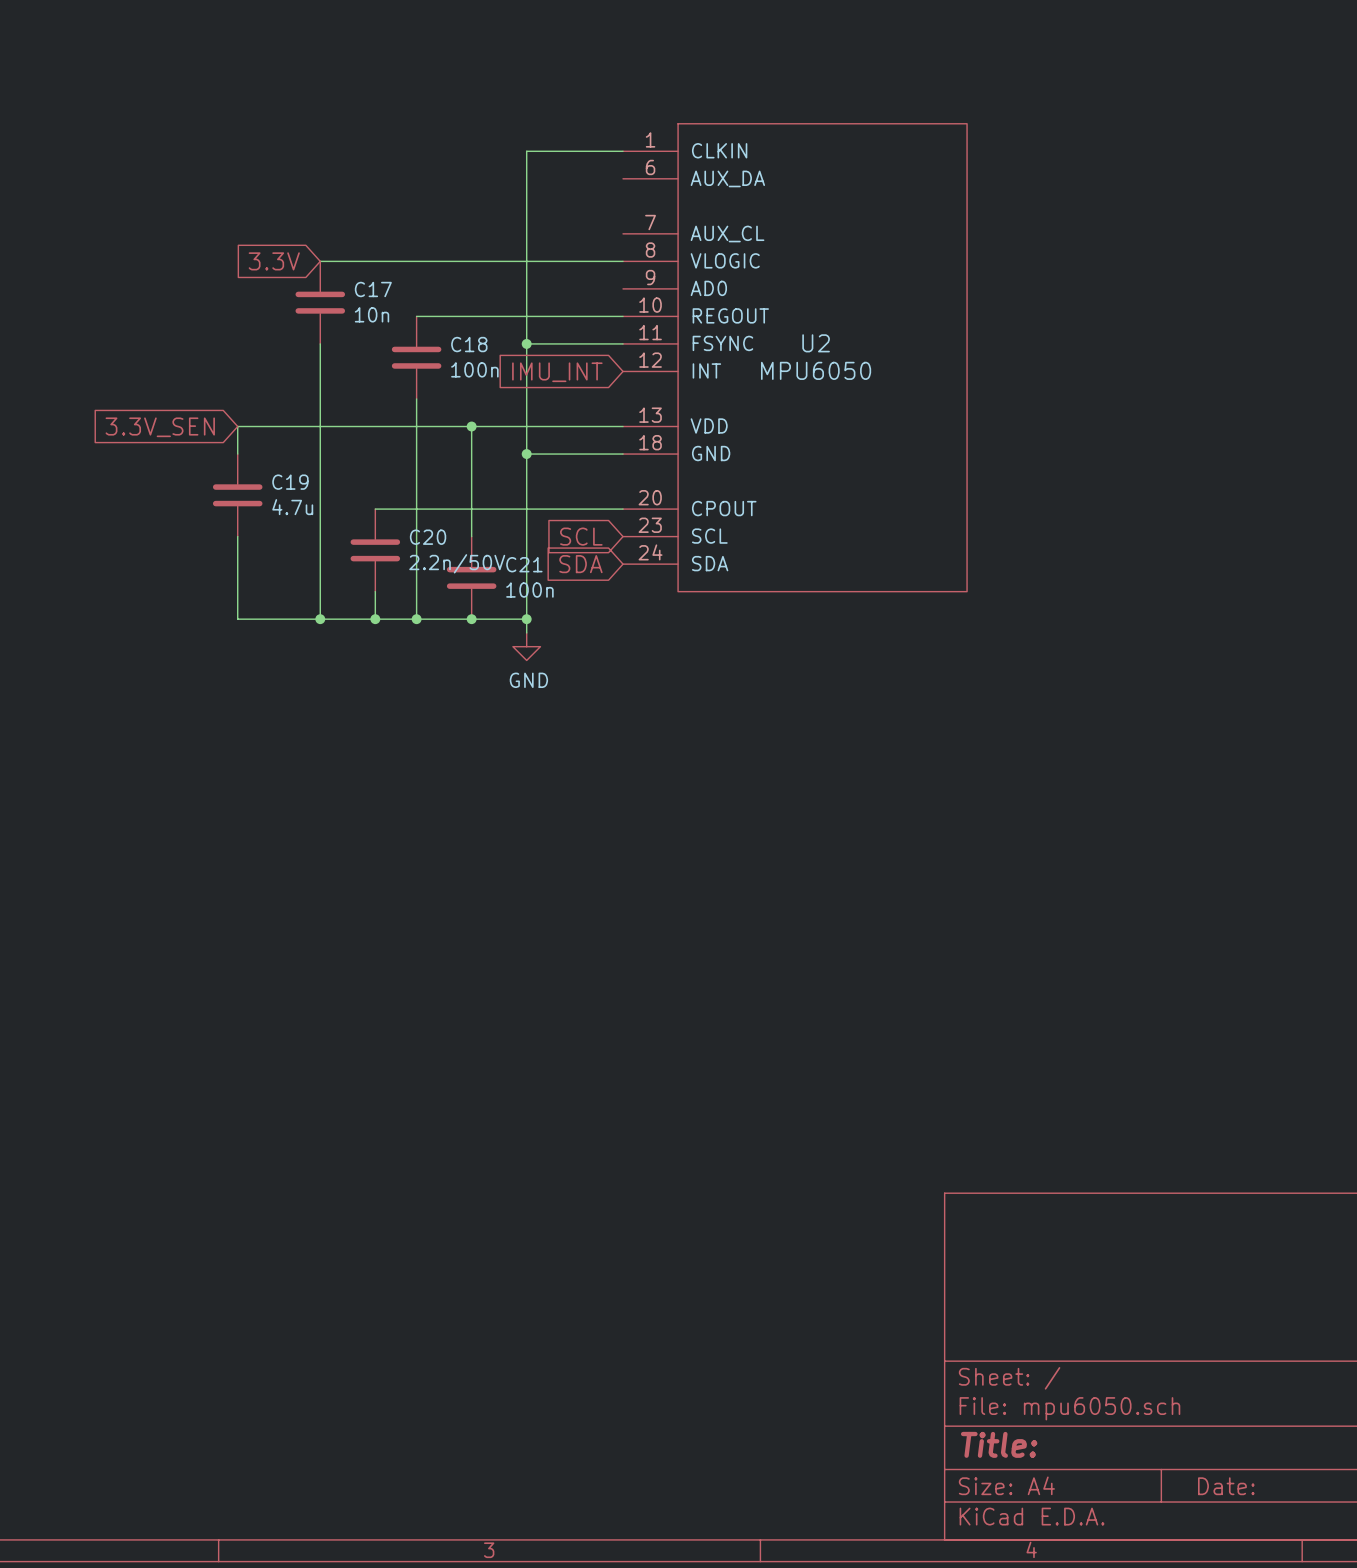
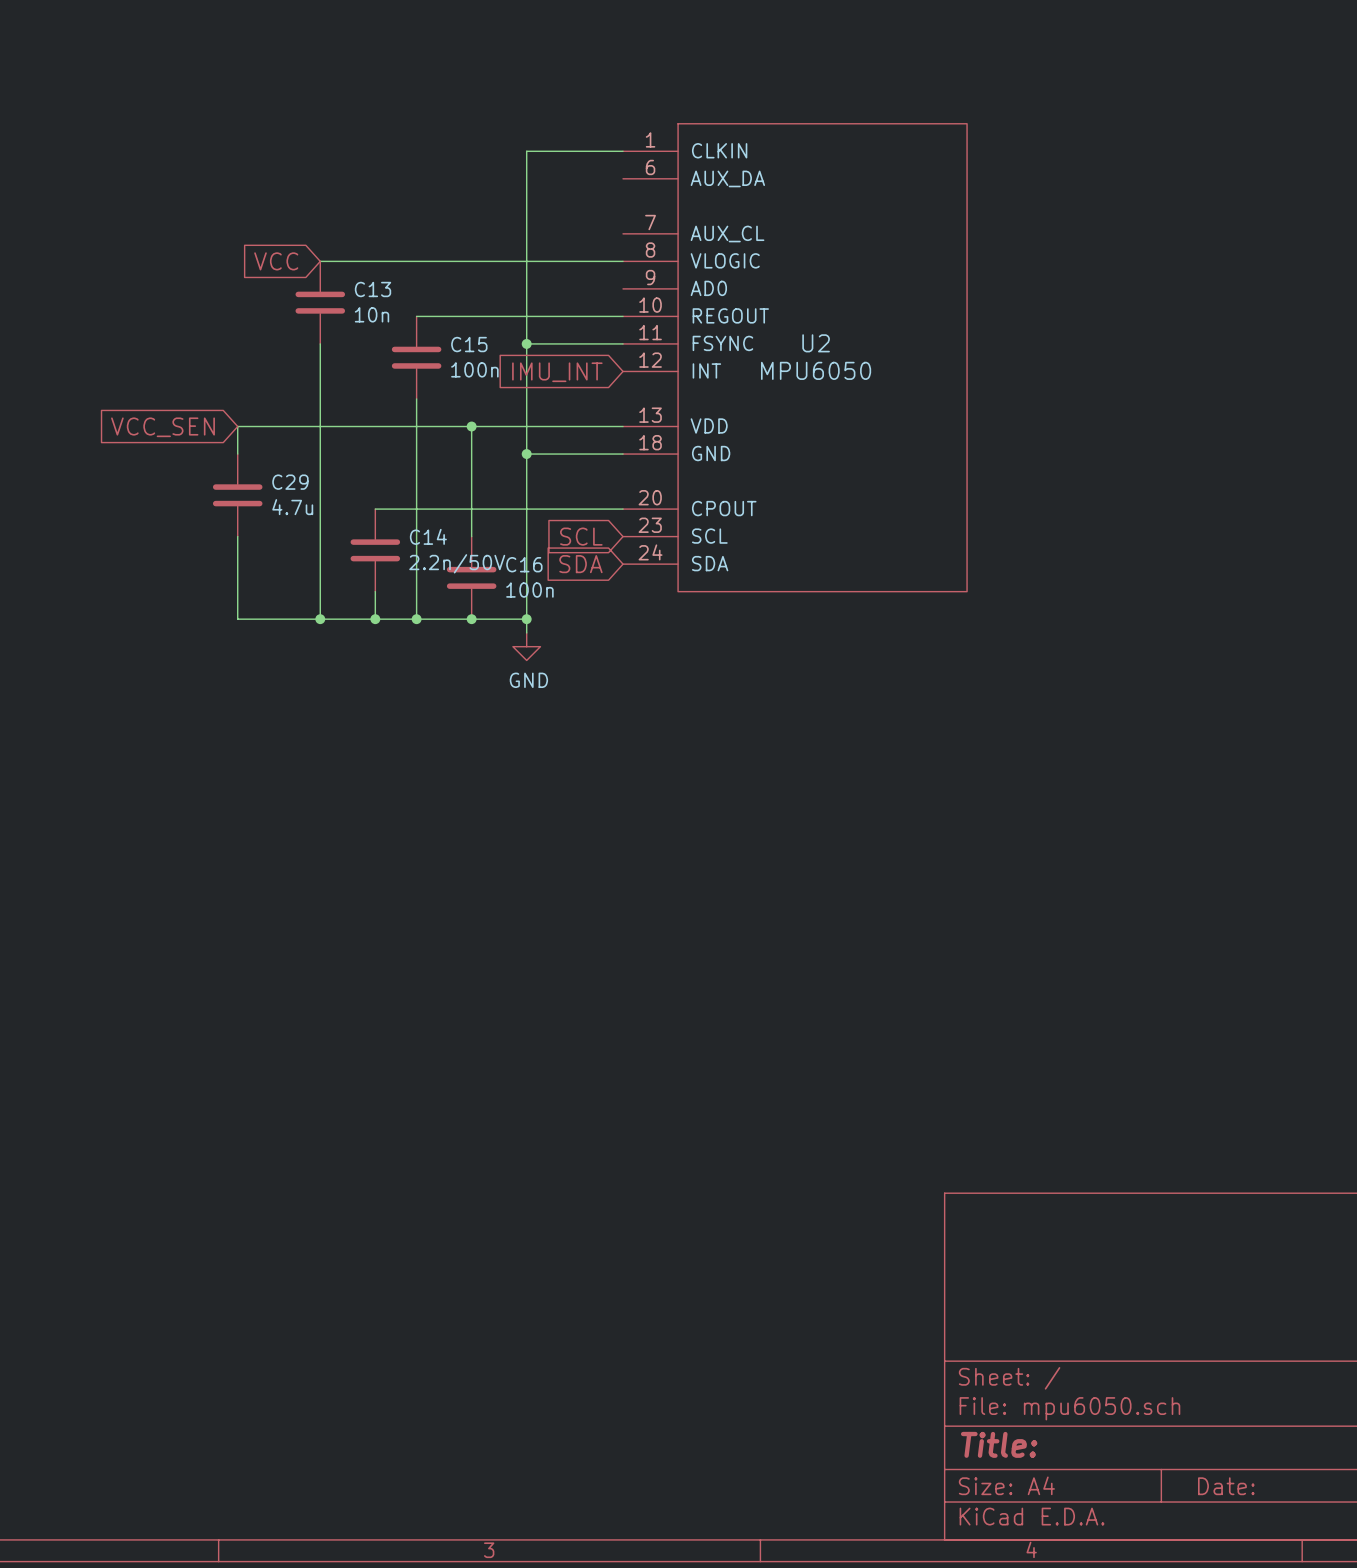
global label: 3.3V (274, 261) -> VCC (276, 261)
C17 name: C17 (373, 289) -> C13 (373, 289)
C18 name: C18 (469, 344) -> C15 (469, 344)
global label: 3.3V_SEN (160, 427) -> VCC_SEN (163, 427)
C19 name: C19 (290, 482) -> C29 (290, 482)
C20 name: C20 (428, 537) -> C14 (428, 536)
C21 name: C21 (524, 564) -> C16 (524, 564)

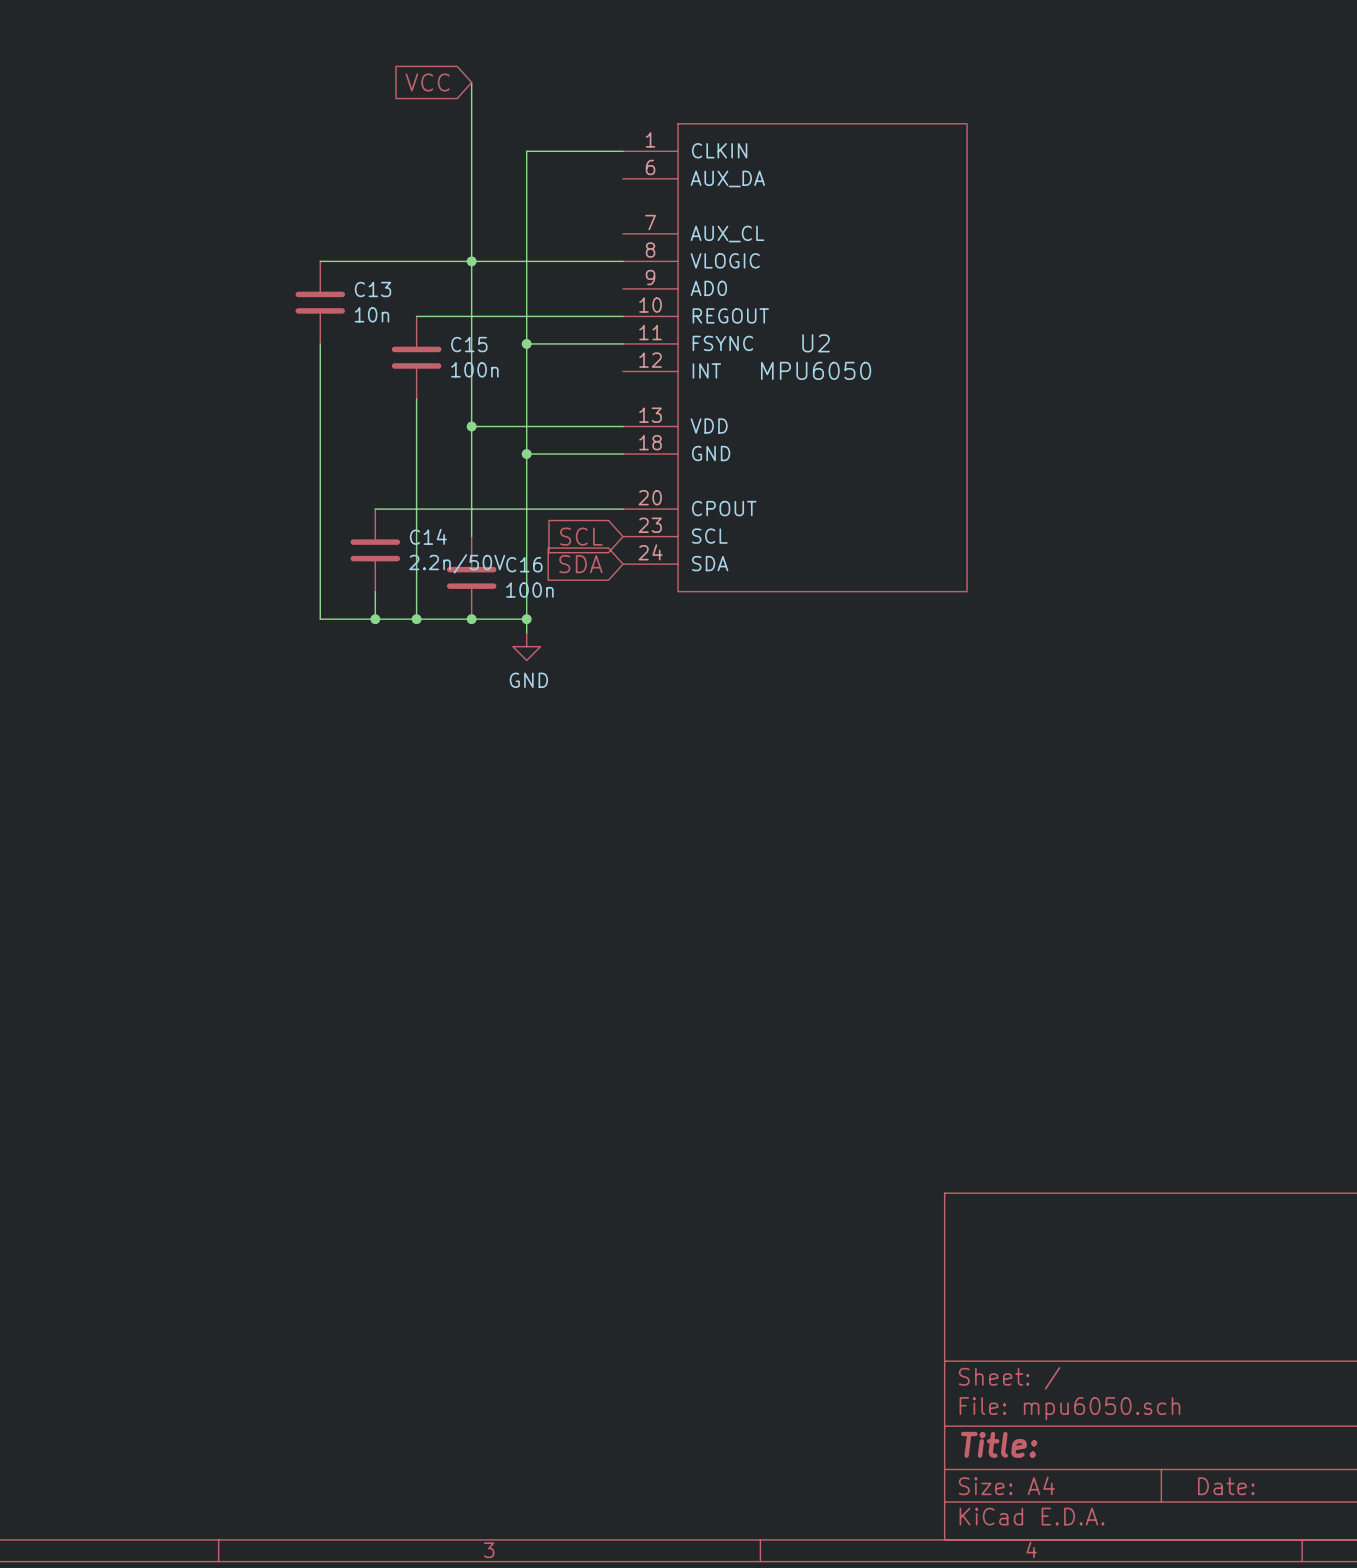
global label position: VCC (276, 261) -> VCC (427, 82)
junction: none -> (471, 261)
global label: IMU_INT (557, 372) -> none
wire: (471, 426) (237, 426) (237, 454) -> (471, 426) (471, 82)
global label: VCC_SEN (163, 427) -> none
C29: 4.7u (237, 495) -> none
wire: (237, 536) (237, 619) (320, 619) -> none
junction: (320, 619) -> none

